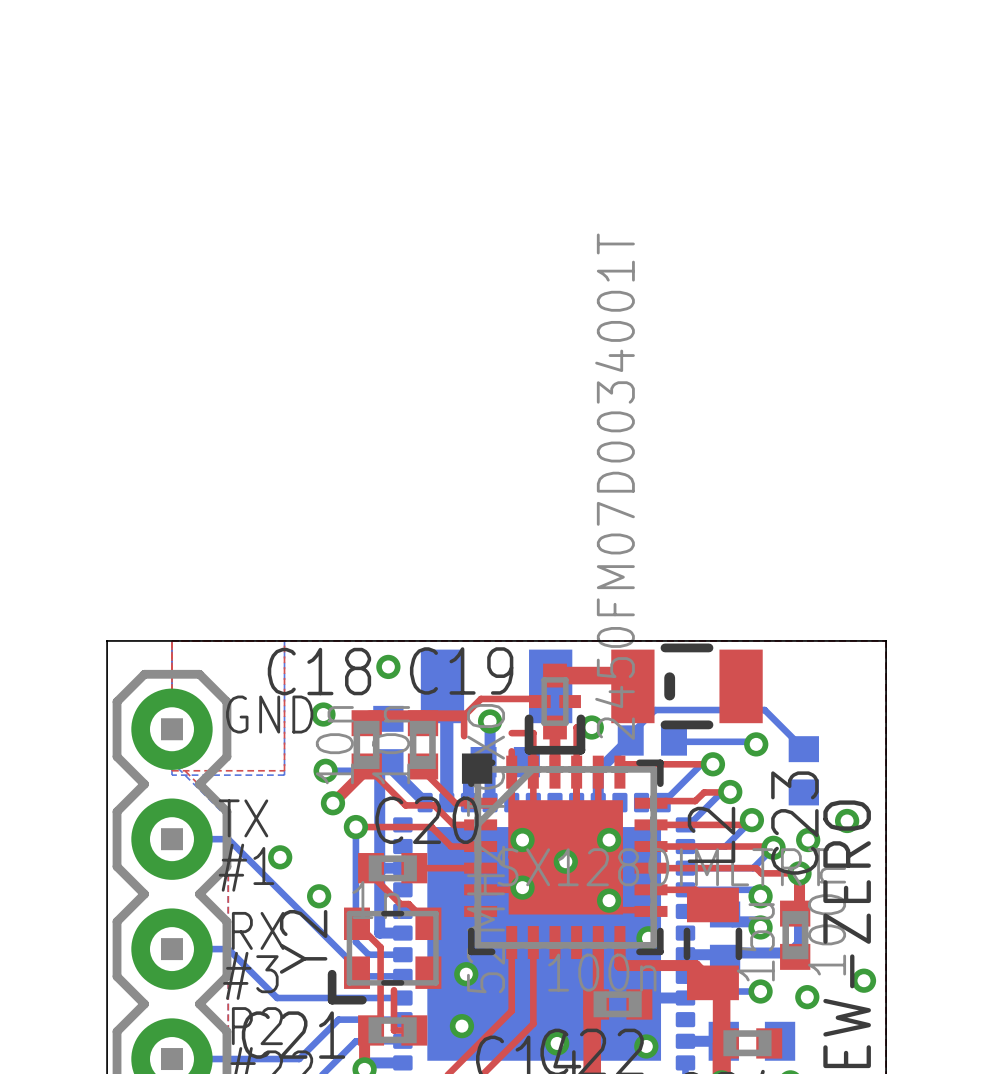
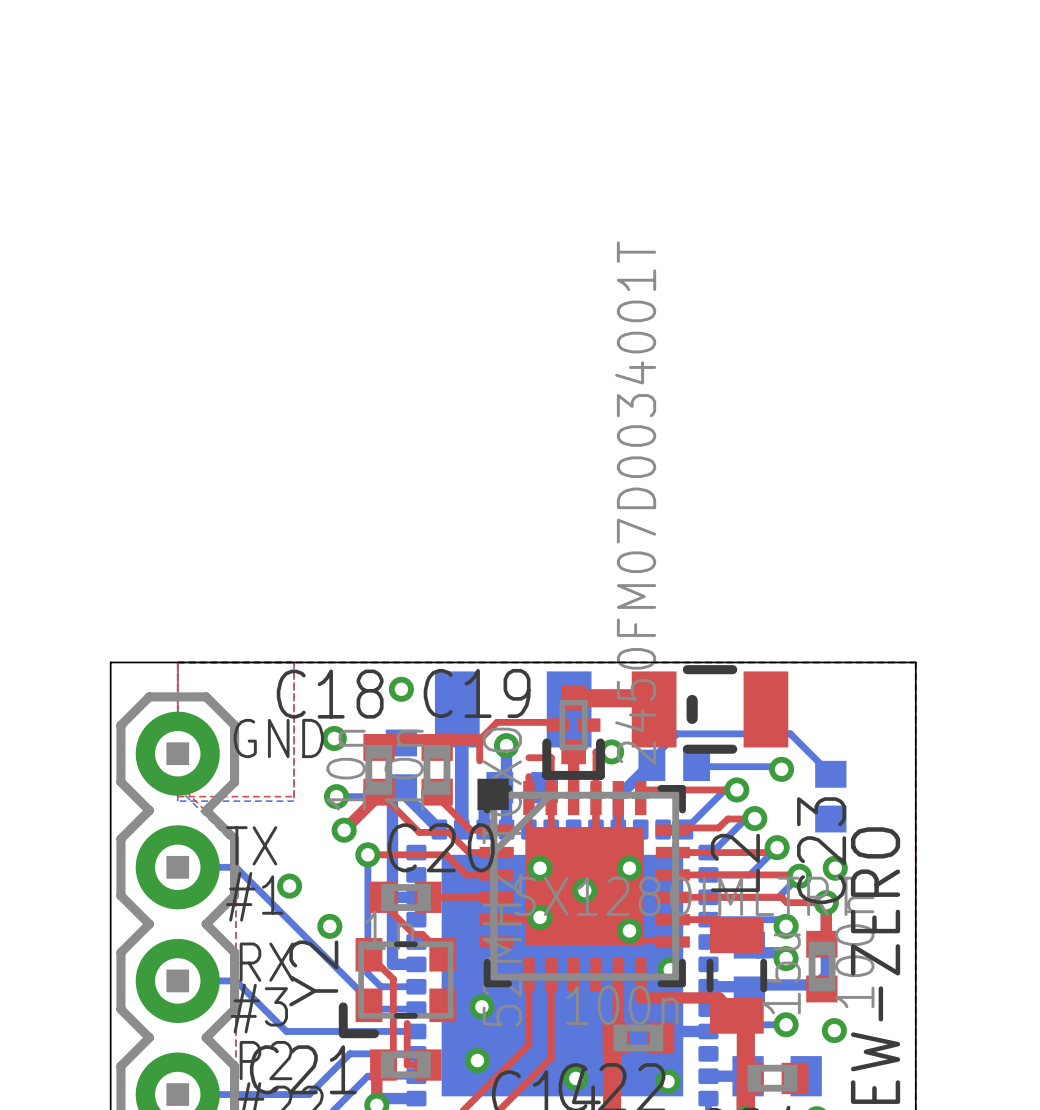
via: (847, 820) -> none
via: (863, 980) -> none

